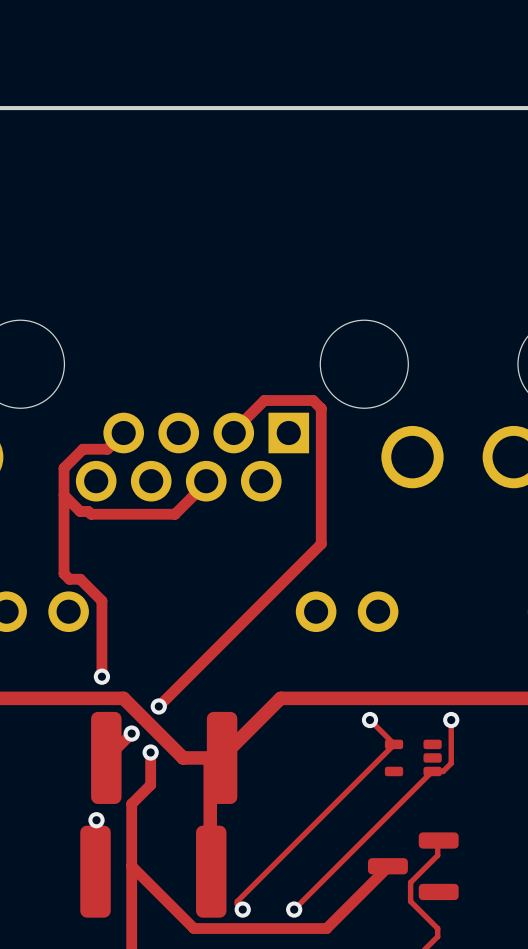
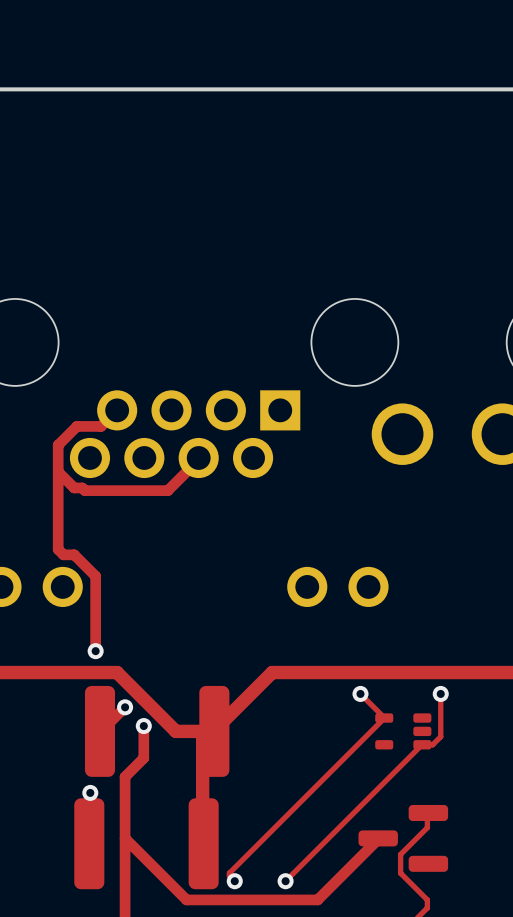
top track: (234, 430) (264, 400) (313, 400) (321, 408) (321, 544) (158, 706) -> none
via: (158, 706) -> none

